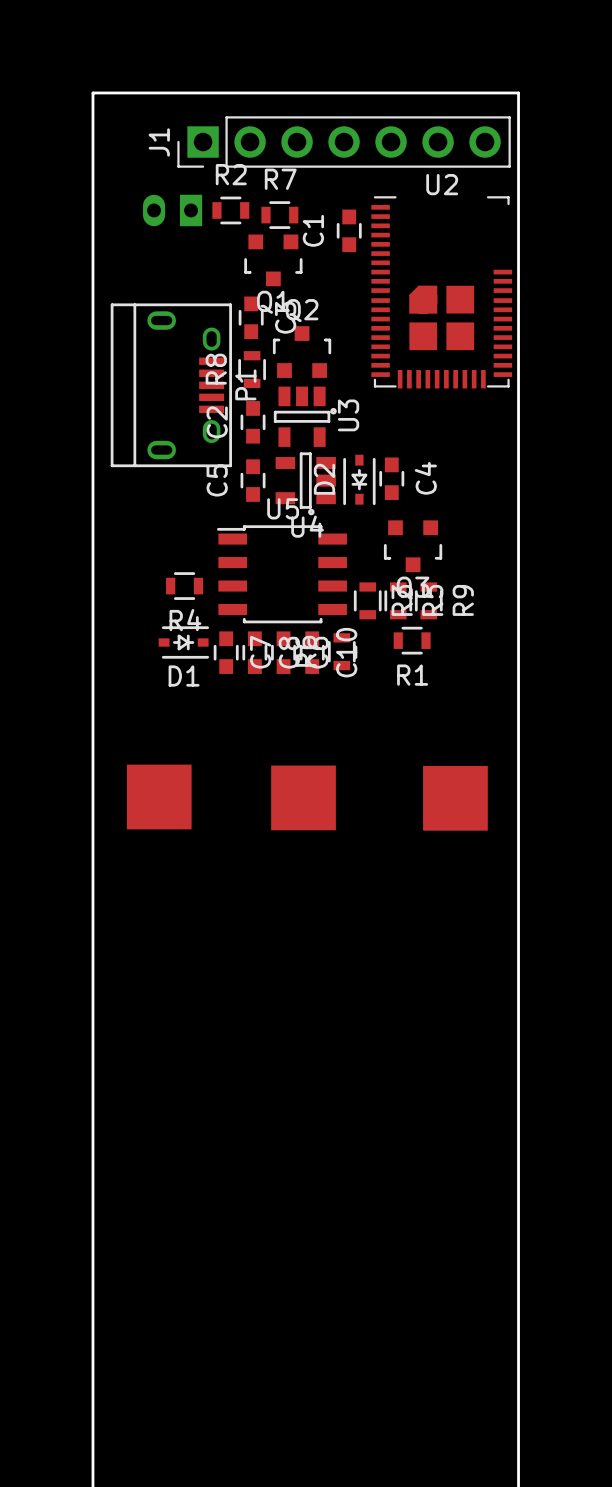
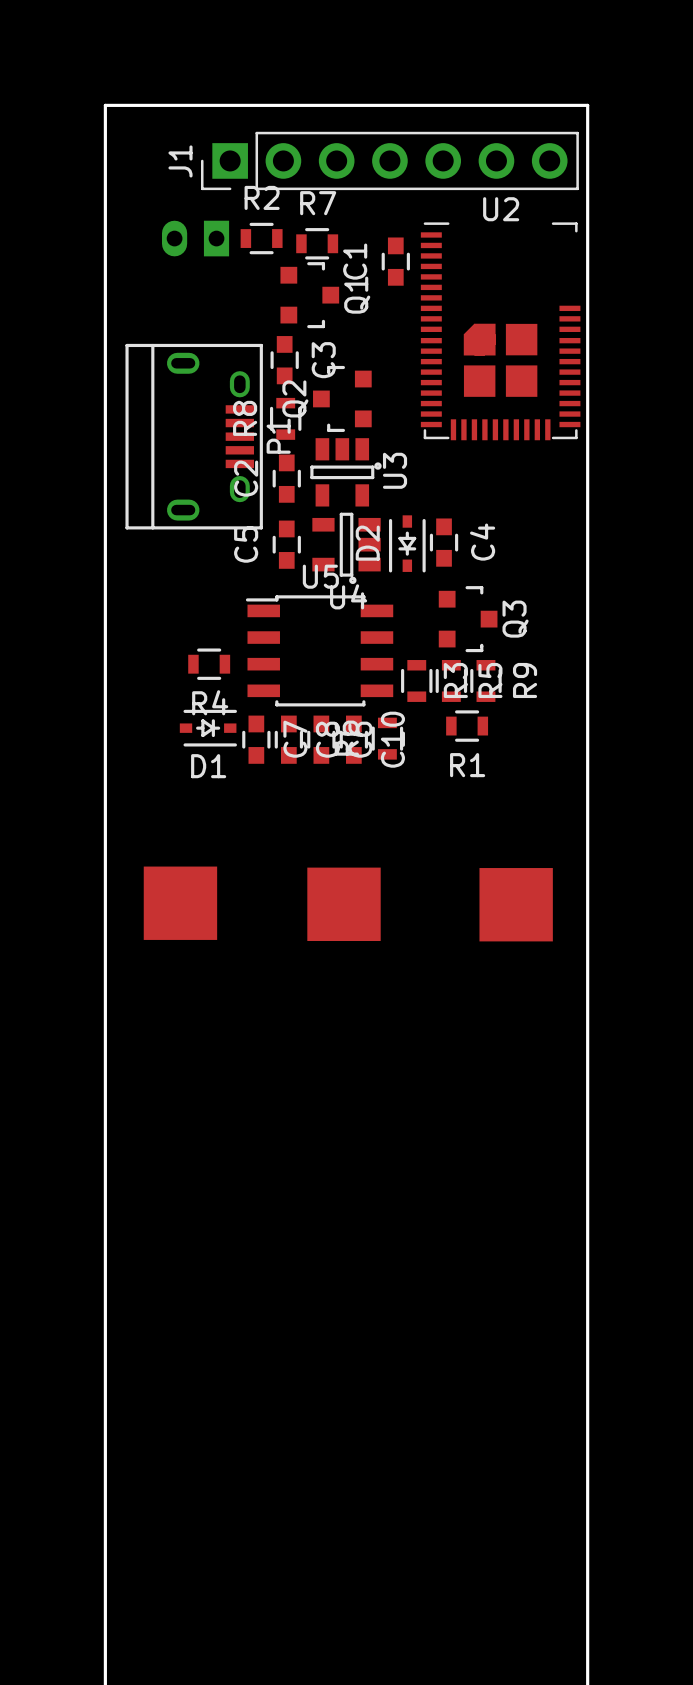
Q1 rotation: 0° (273, 260) -> 90° counterclockwise (309, 295)
Q2 rotation: 0° (302, 352) -> 90° counterclockwise (342, 398)
Q3 rotation: 0° (413, 546) -> 90° counterclockwise (468, 619)

